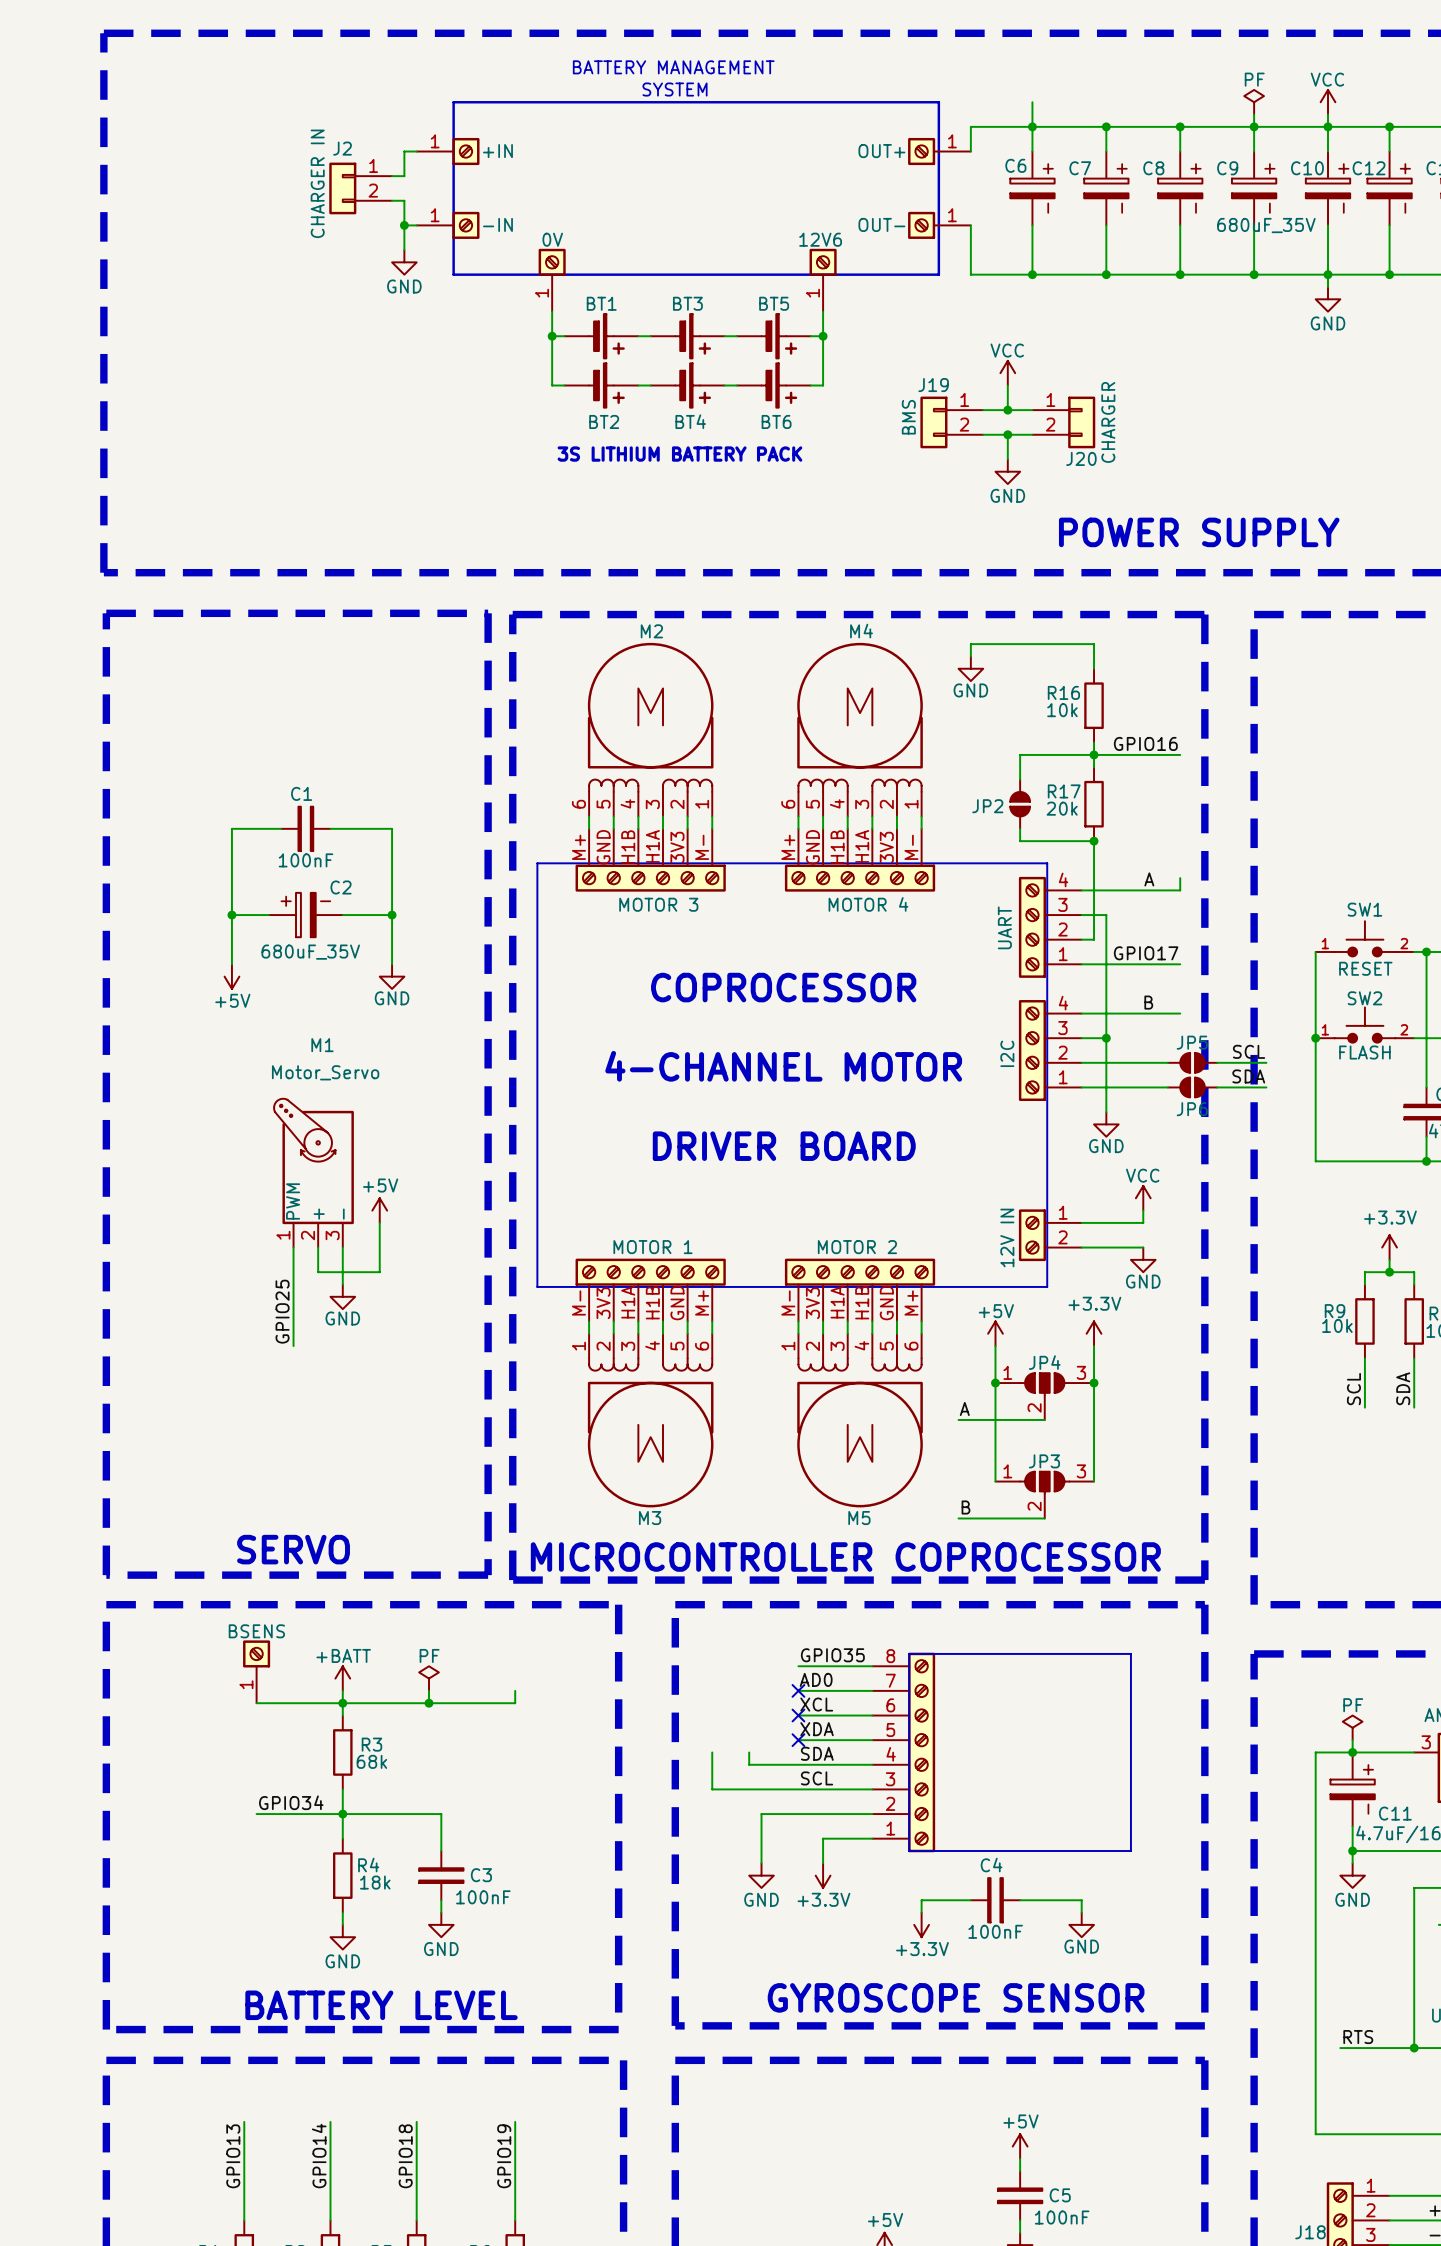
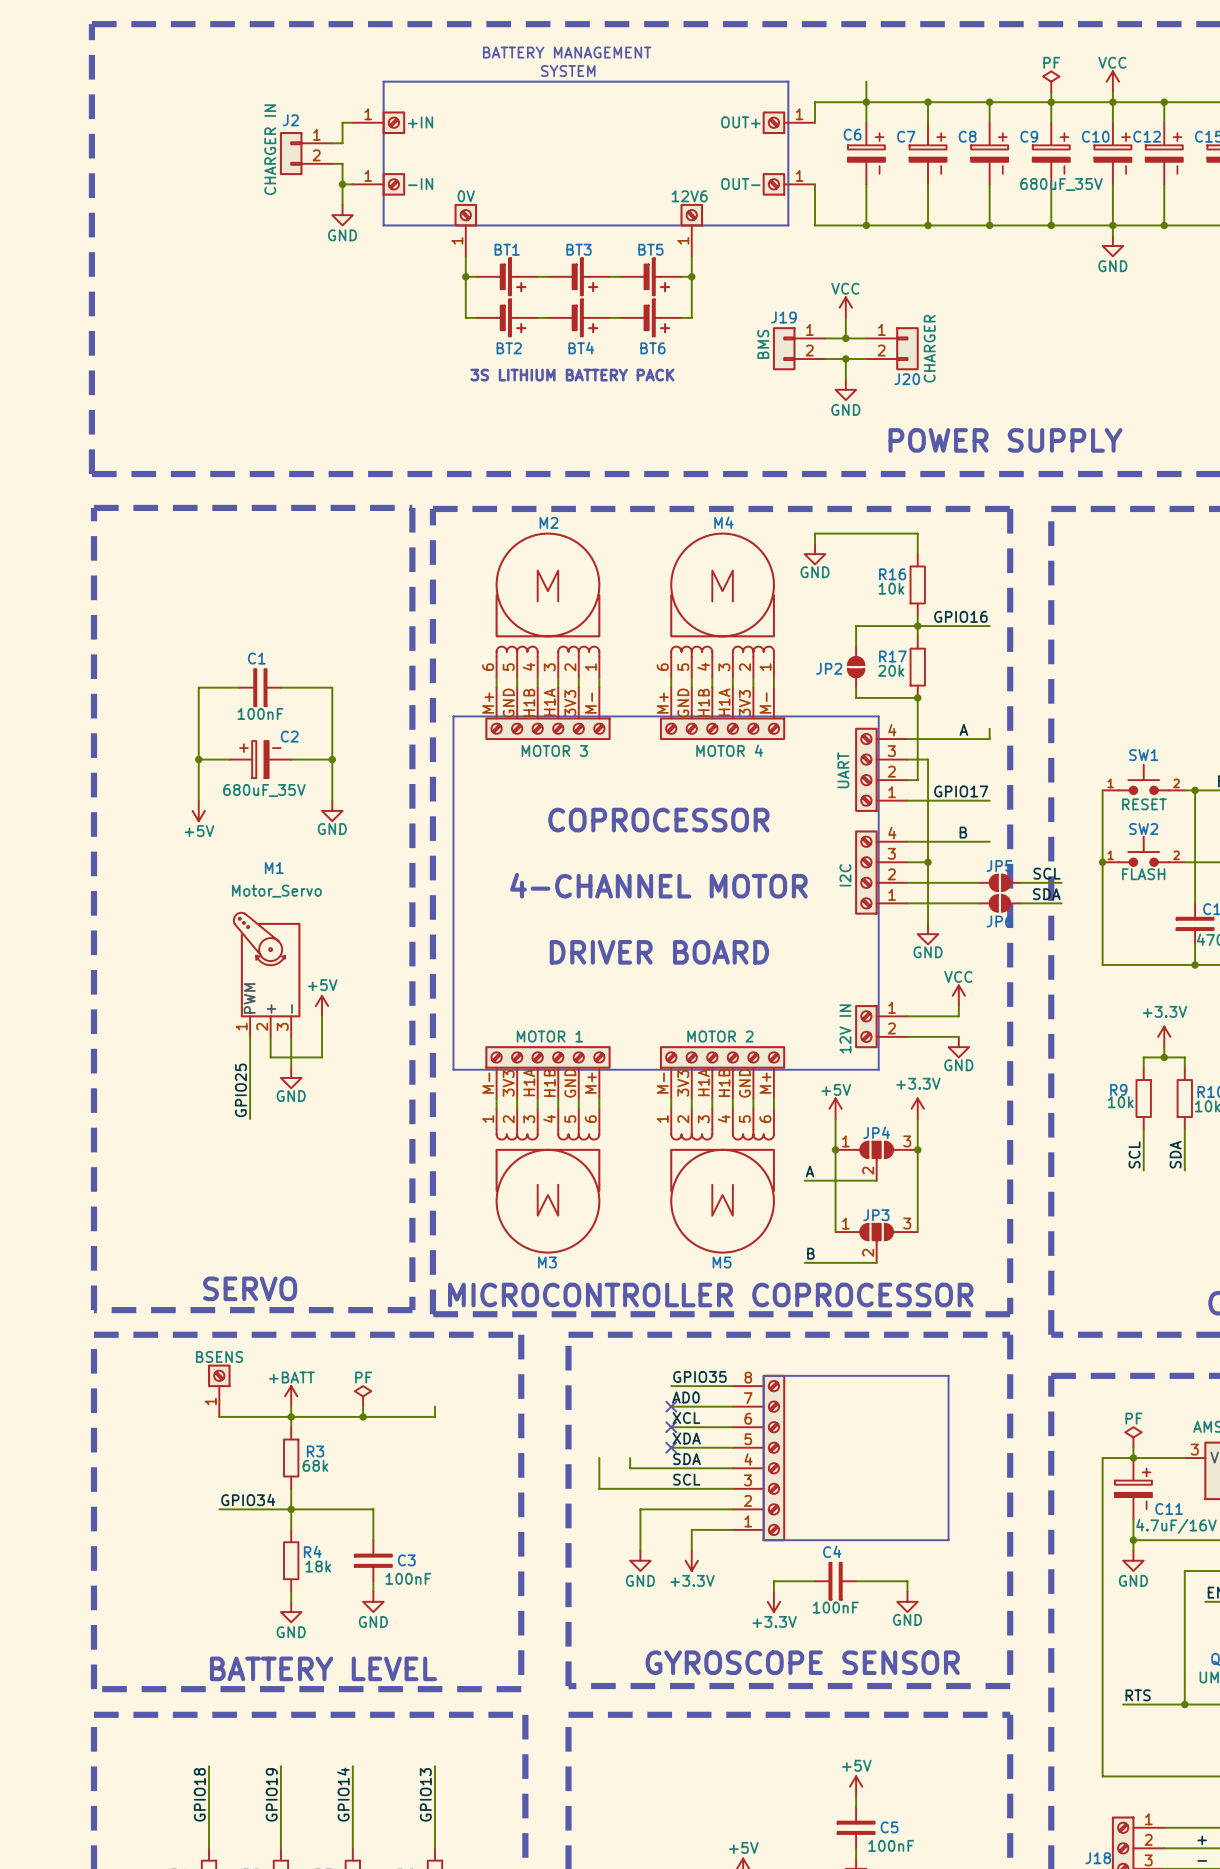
label: GPIO13 (233, 2156) -> GPIO18 (199, 1794)
label: GPIO14 (319, 2156) -> GPIO19 (271, 1794)
label: GPIO18 (405, 2156) -> GPIO14 (343, 1794)
label: GPIO19 (504, 2156) -> GPIO13 (425, 1794)

